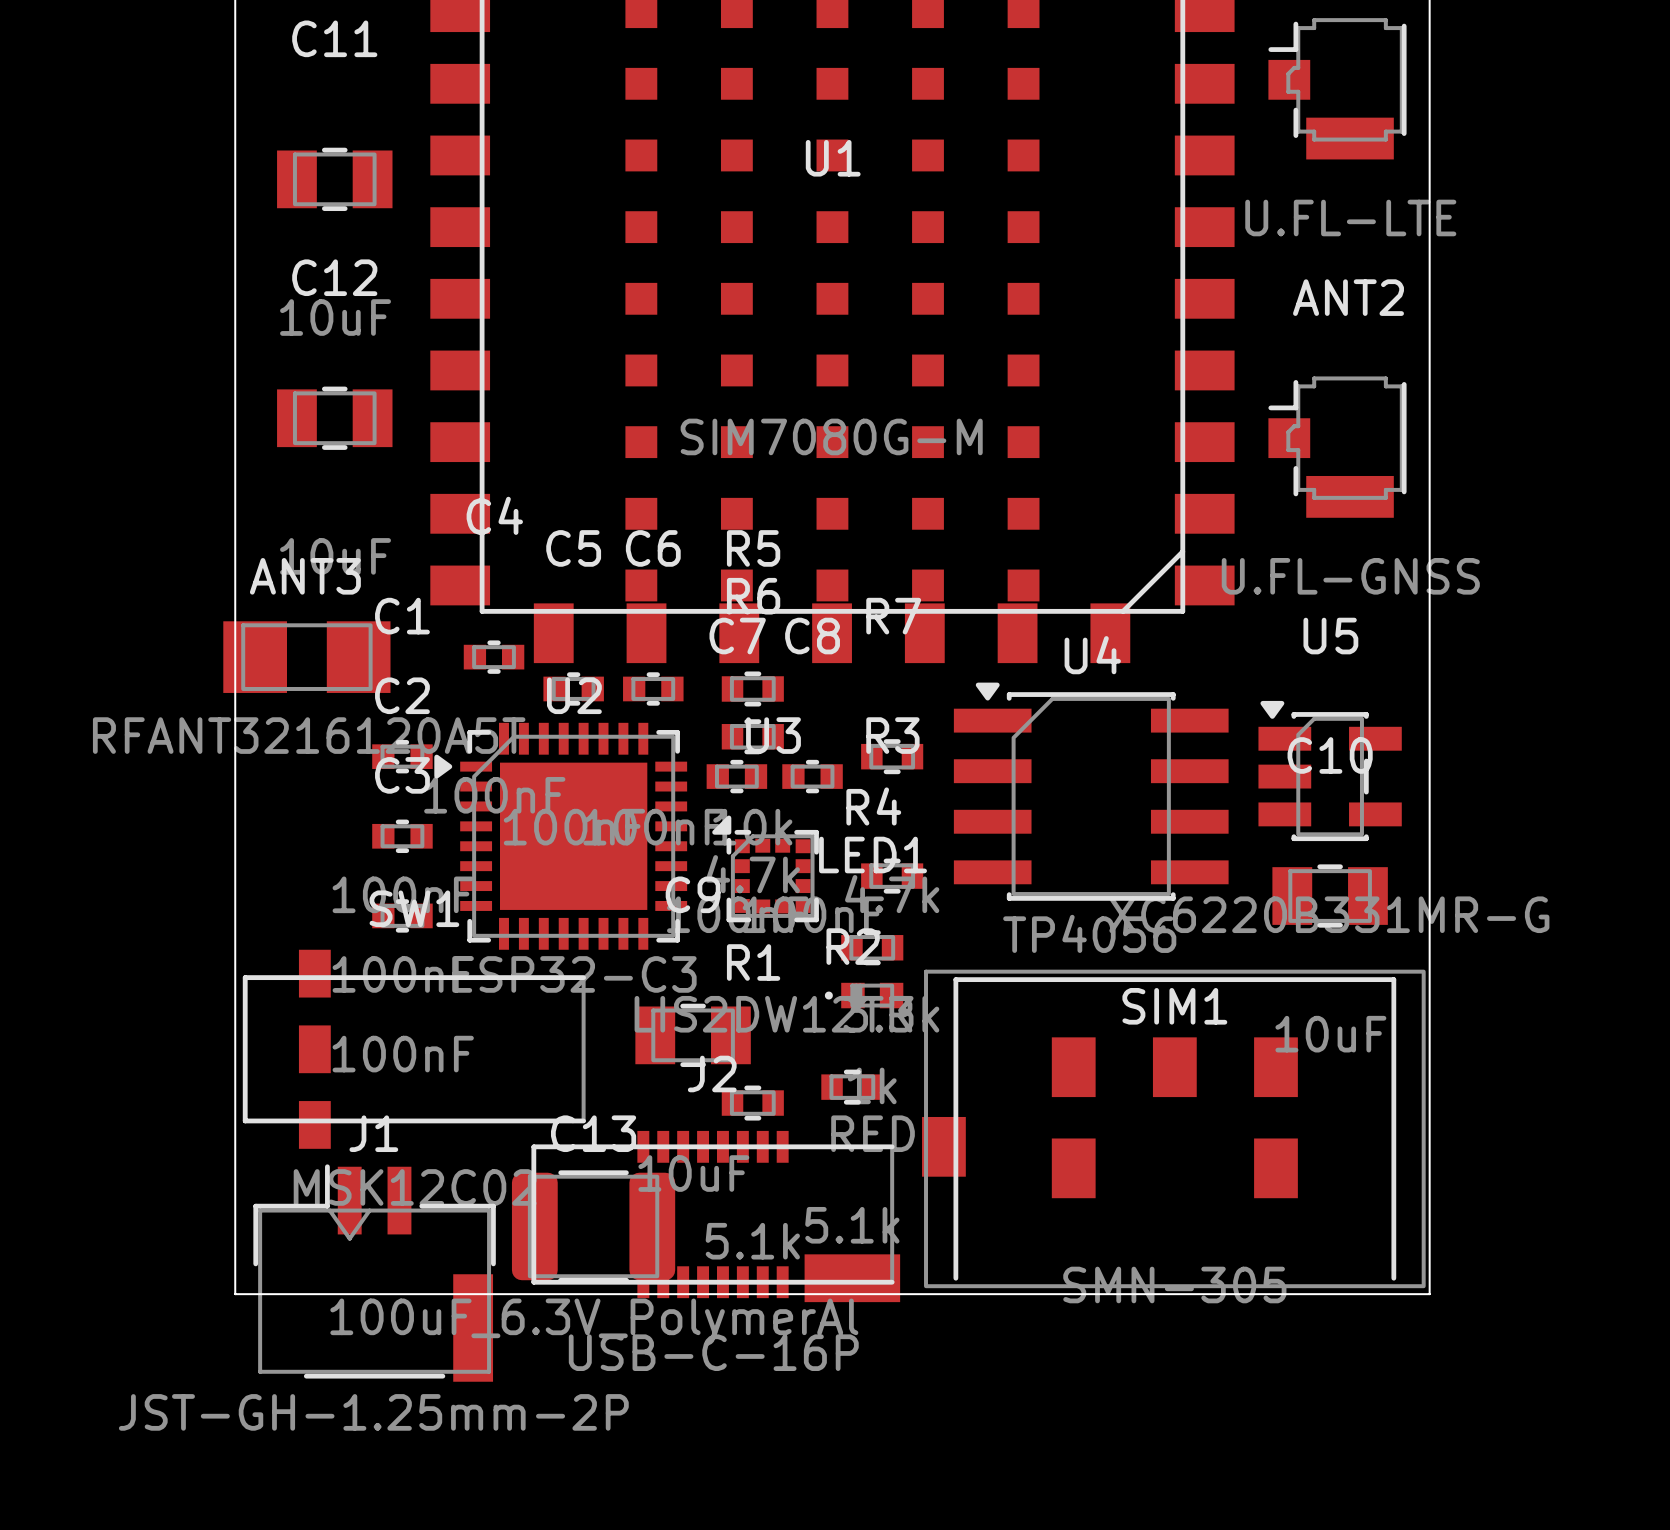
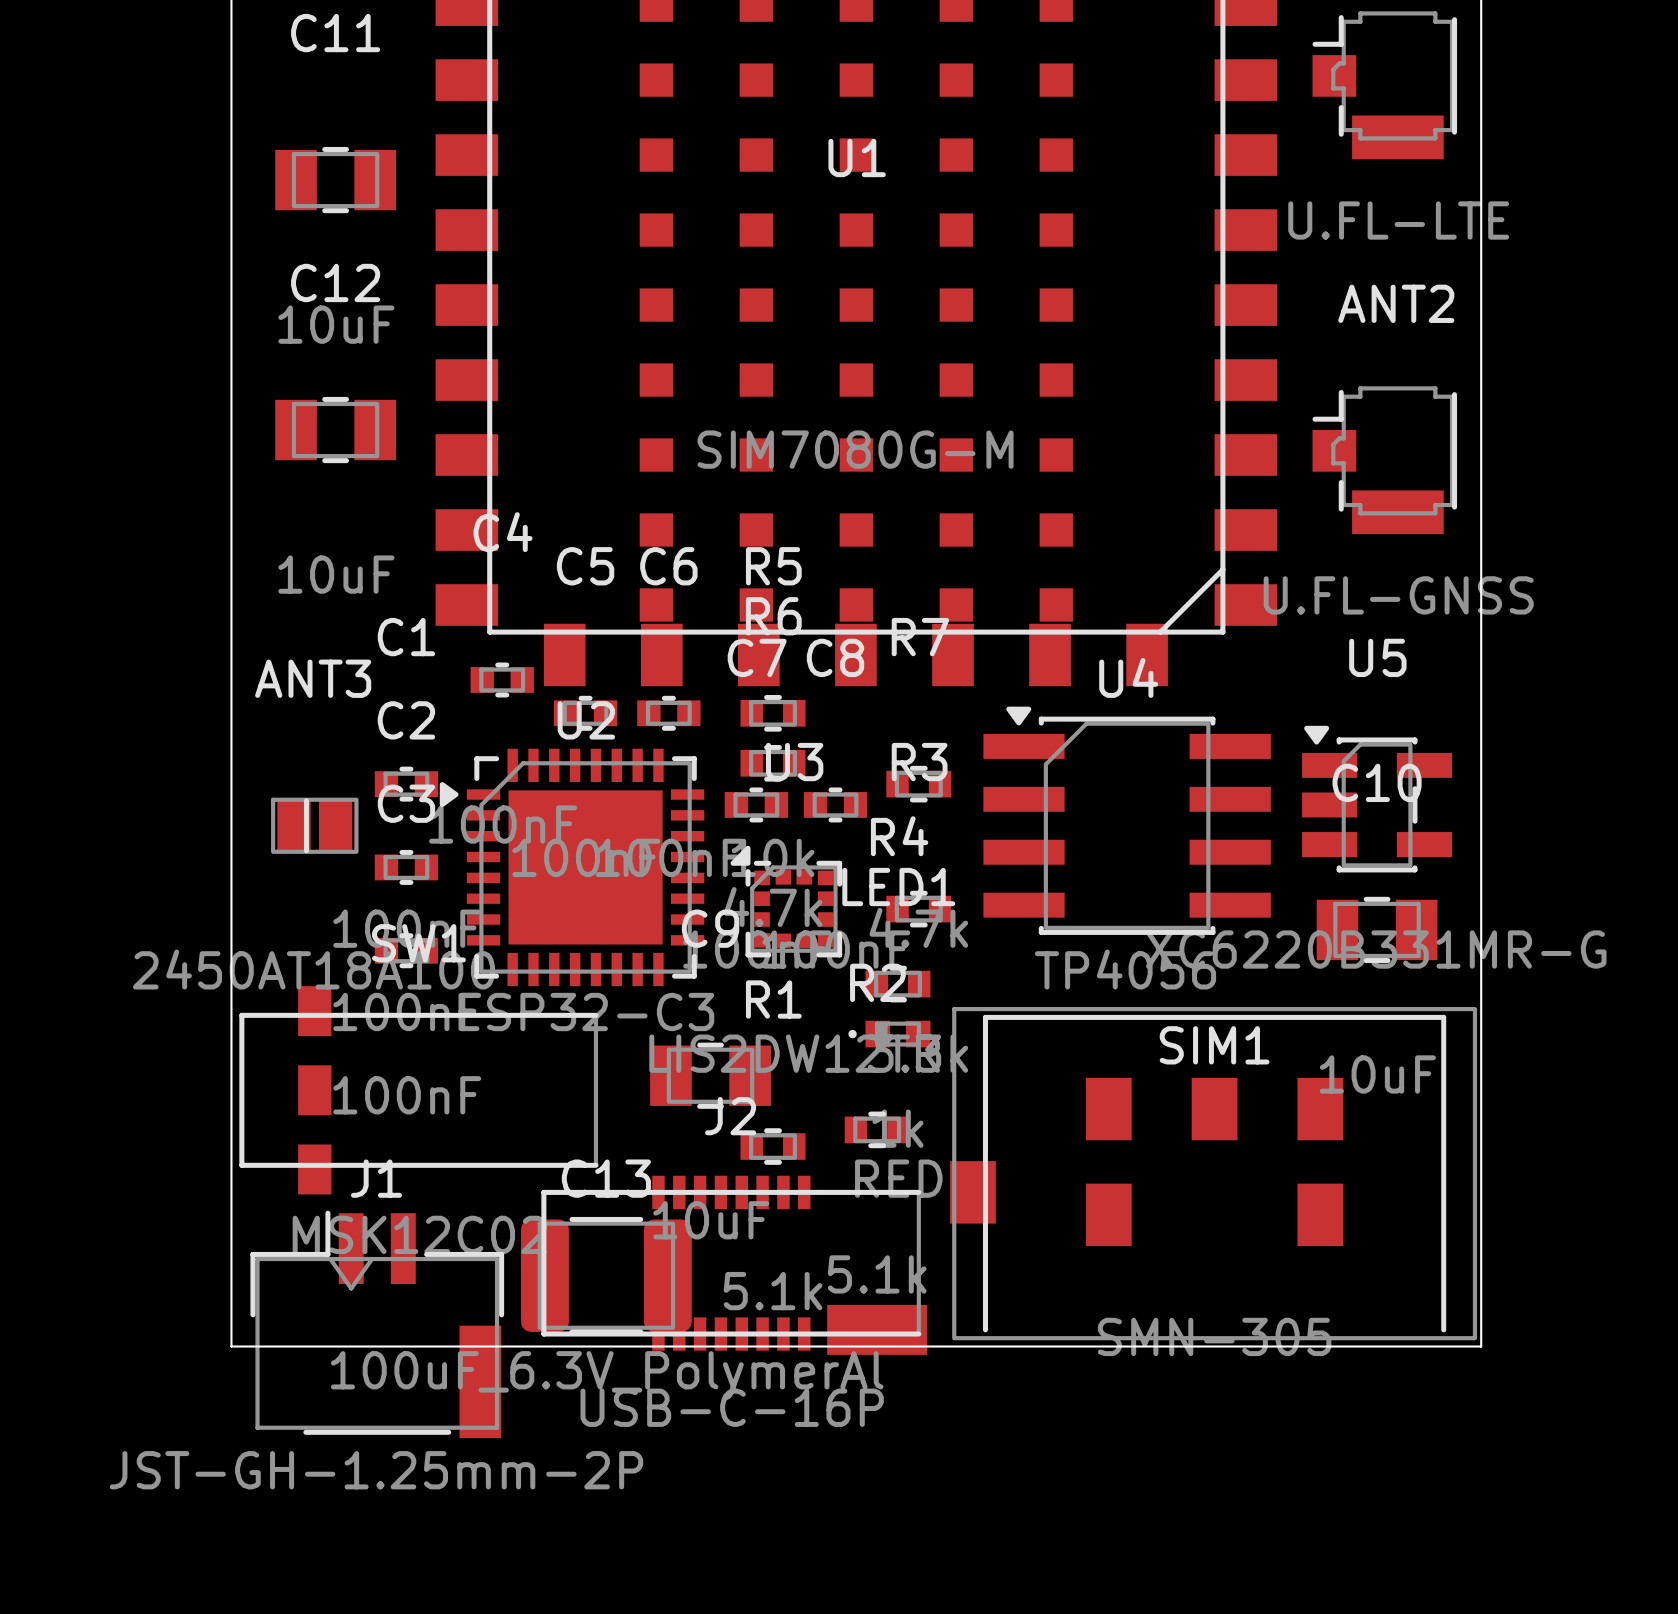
ANT3 footprint: [223, 621, 391, 693] -> [271, 797, 359, 854]
ANT3 value: RFANT3216120A5T (309, 735) -> 2450AT18A100 (313, 969)

